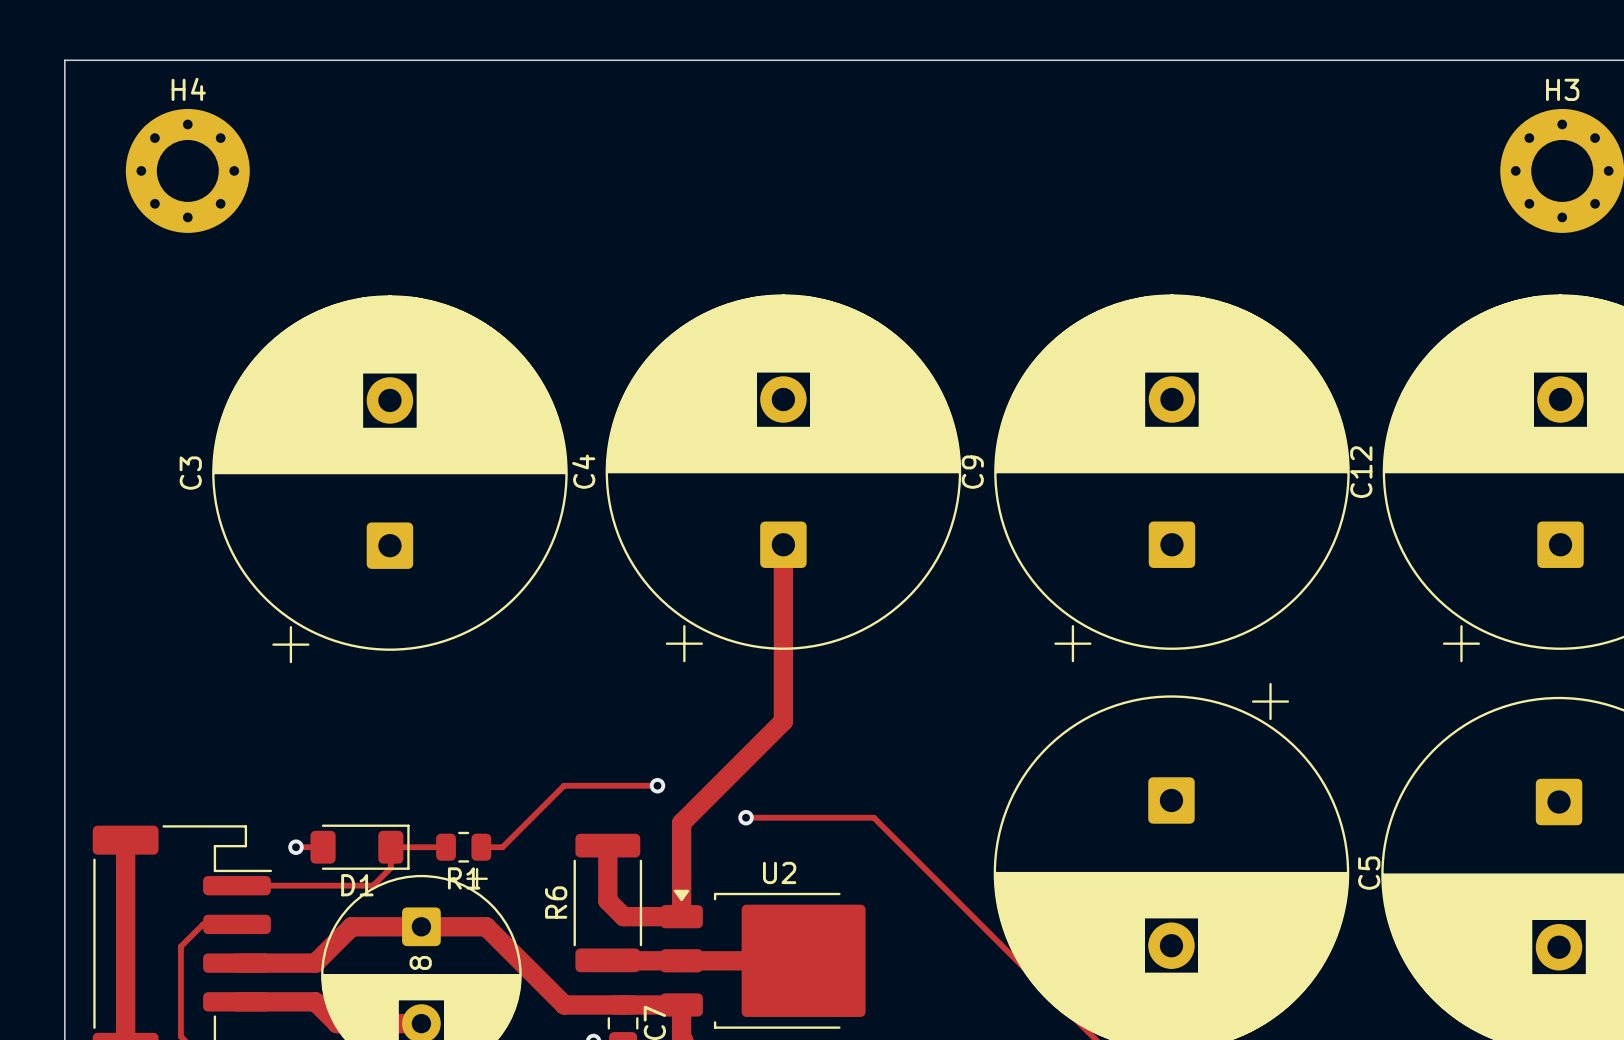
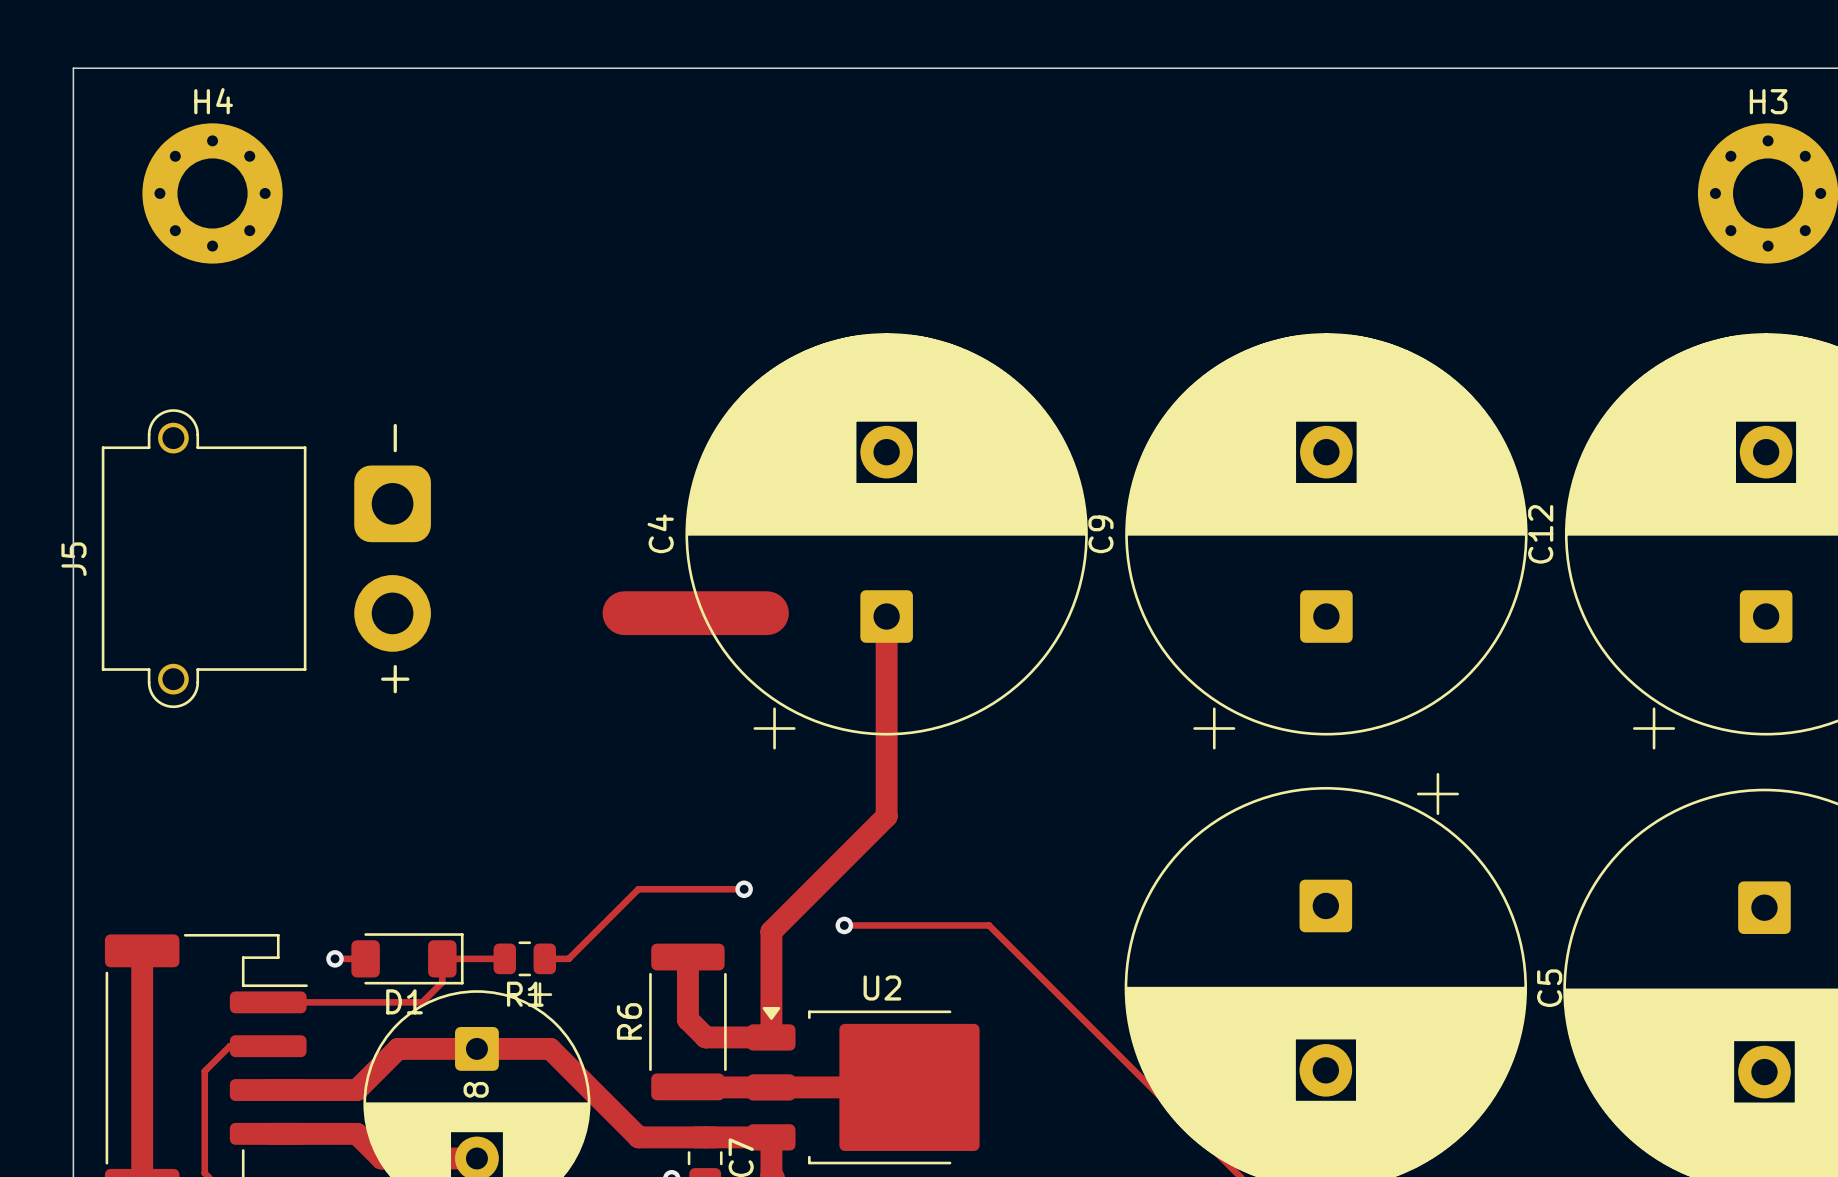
C3: (389, 479) -> none
J5: none -> (266, 558)
track: none -> (624, 613) (766, 613)

